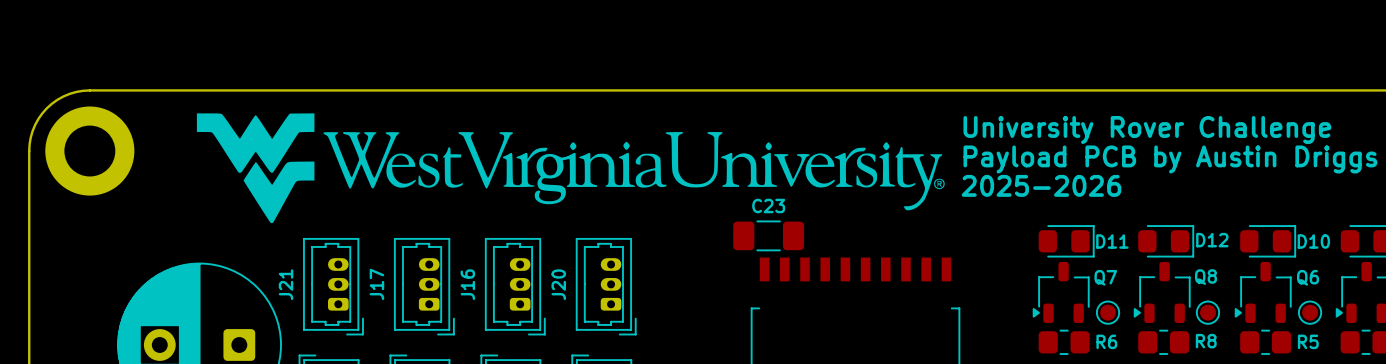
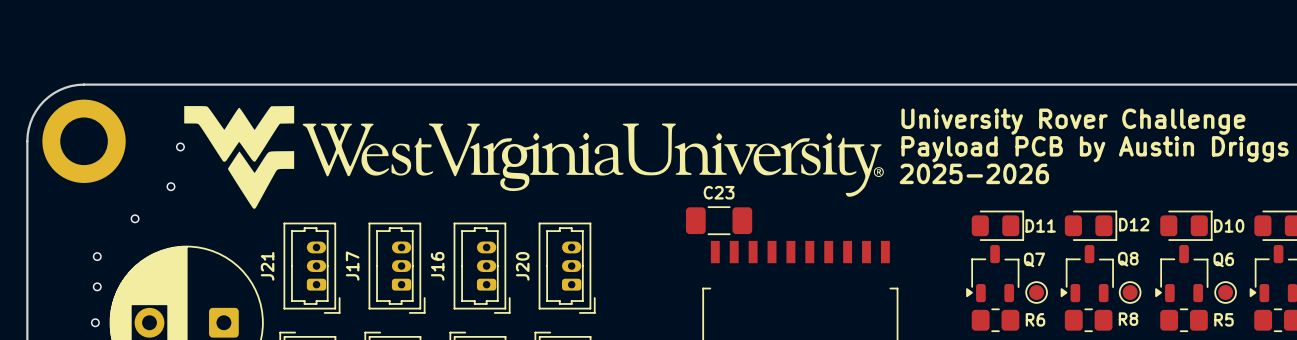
via: none -> (180, 146)
via: none -> (170, 186)
via: none -> (135, 218)
via: none -> (97, 256)
via: none -> (97, 286)
via: none -> (95, 322)

